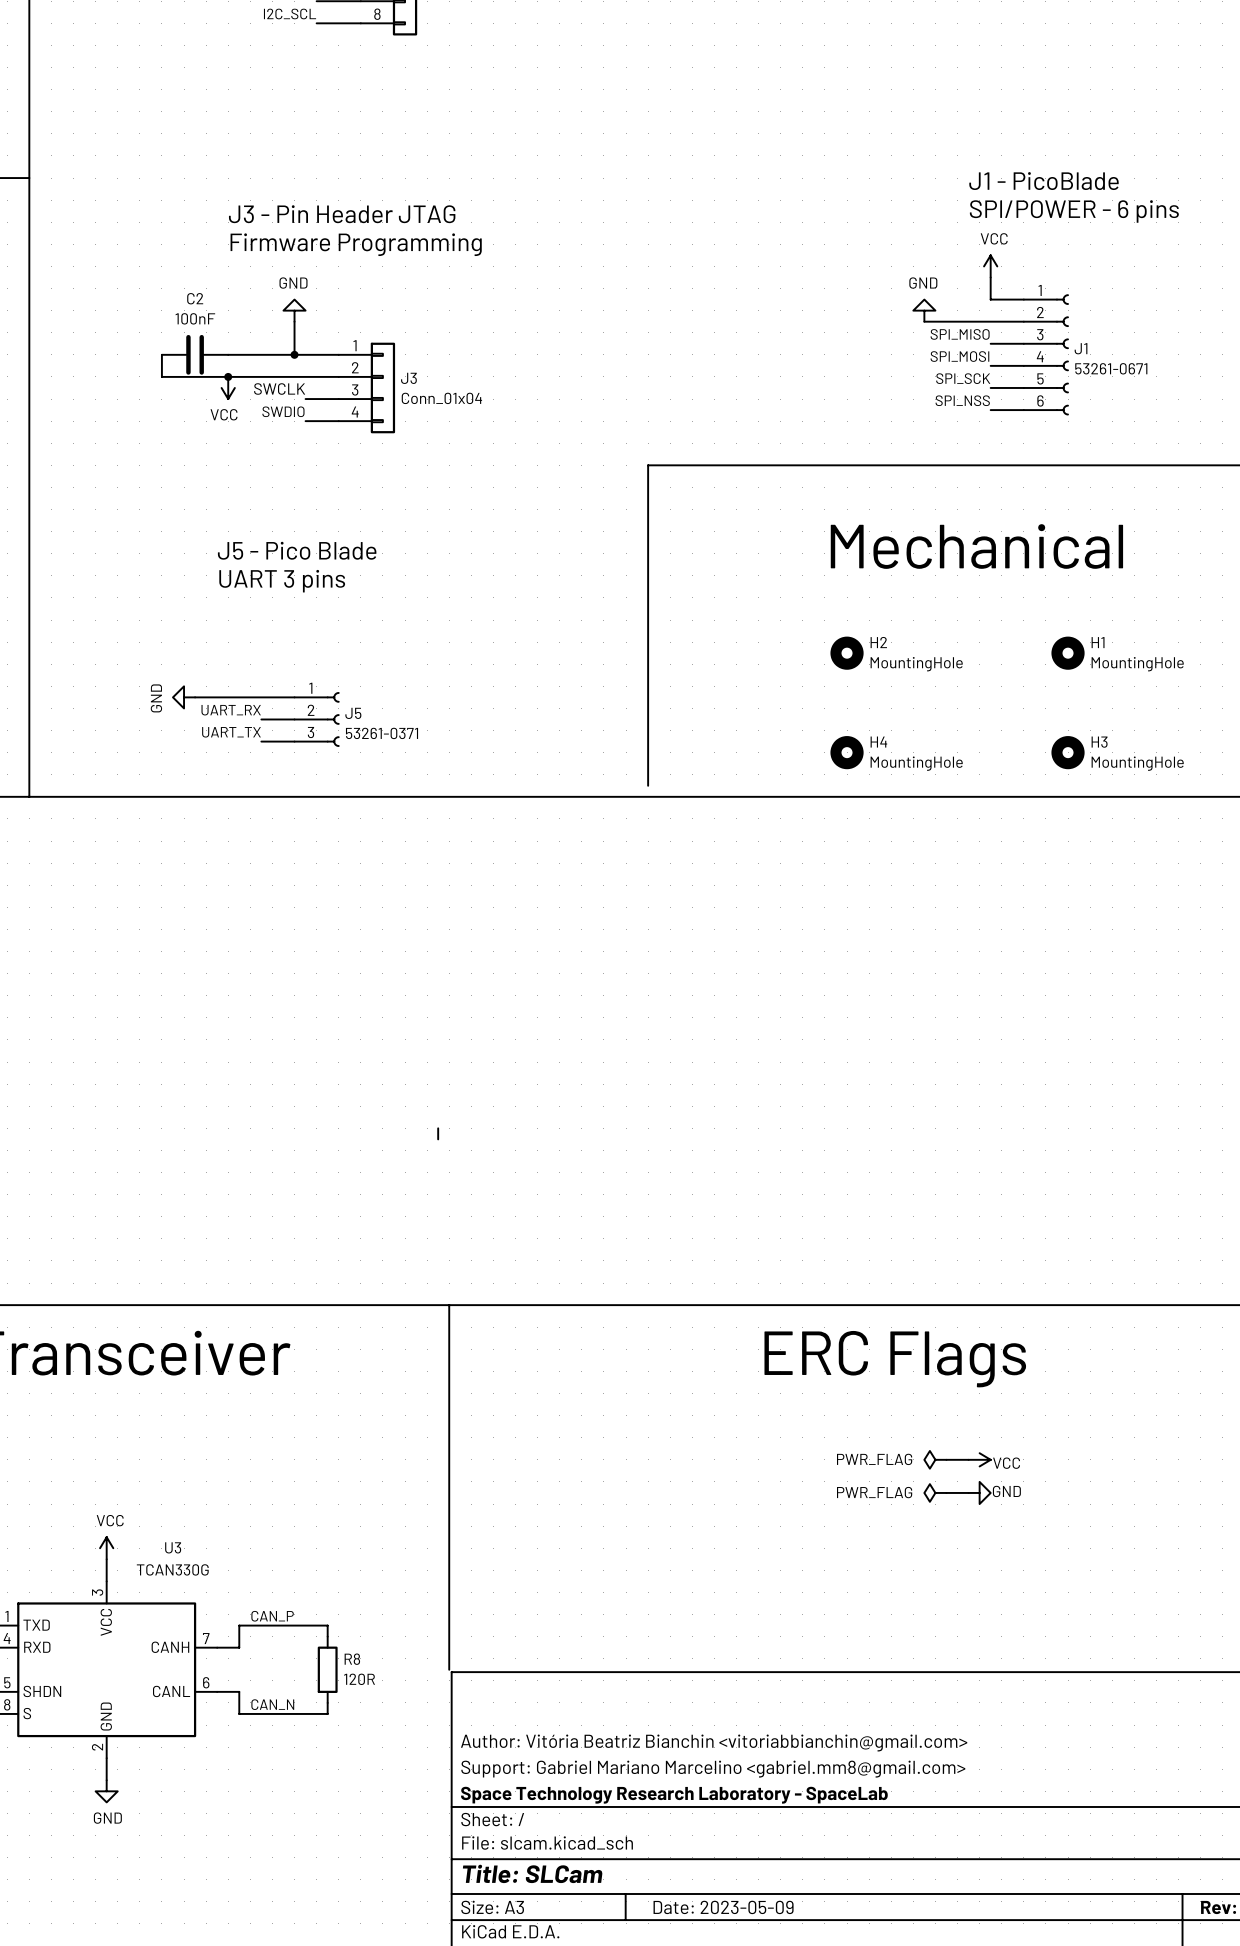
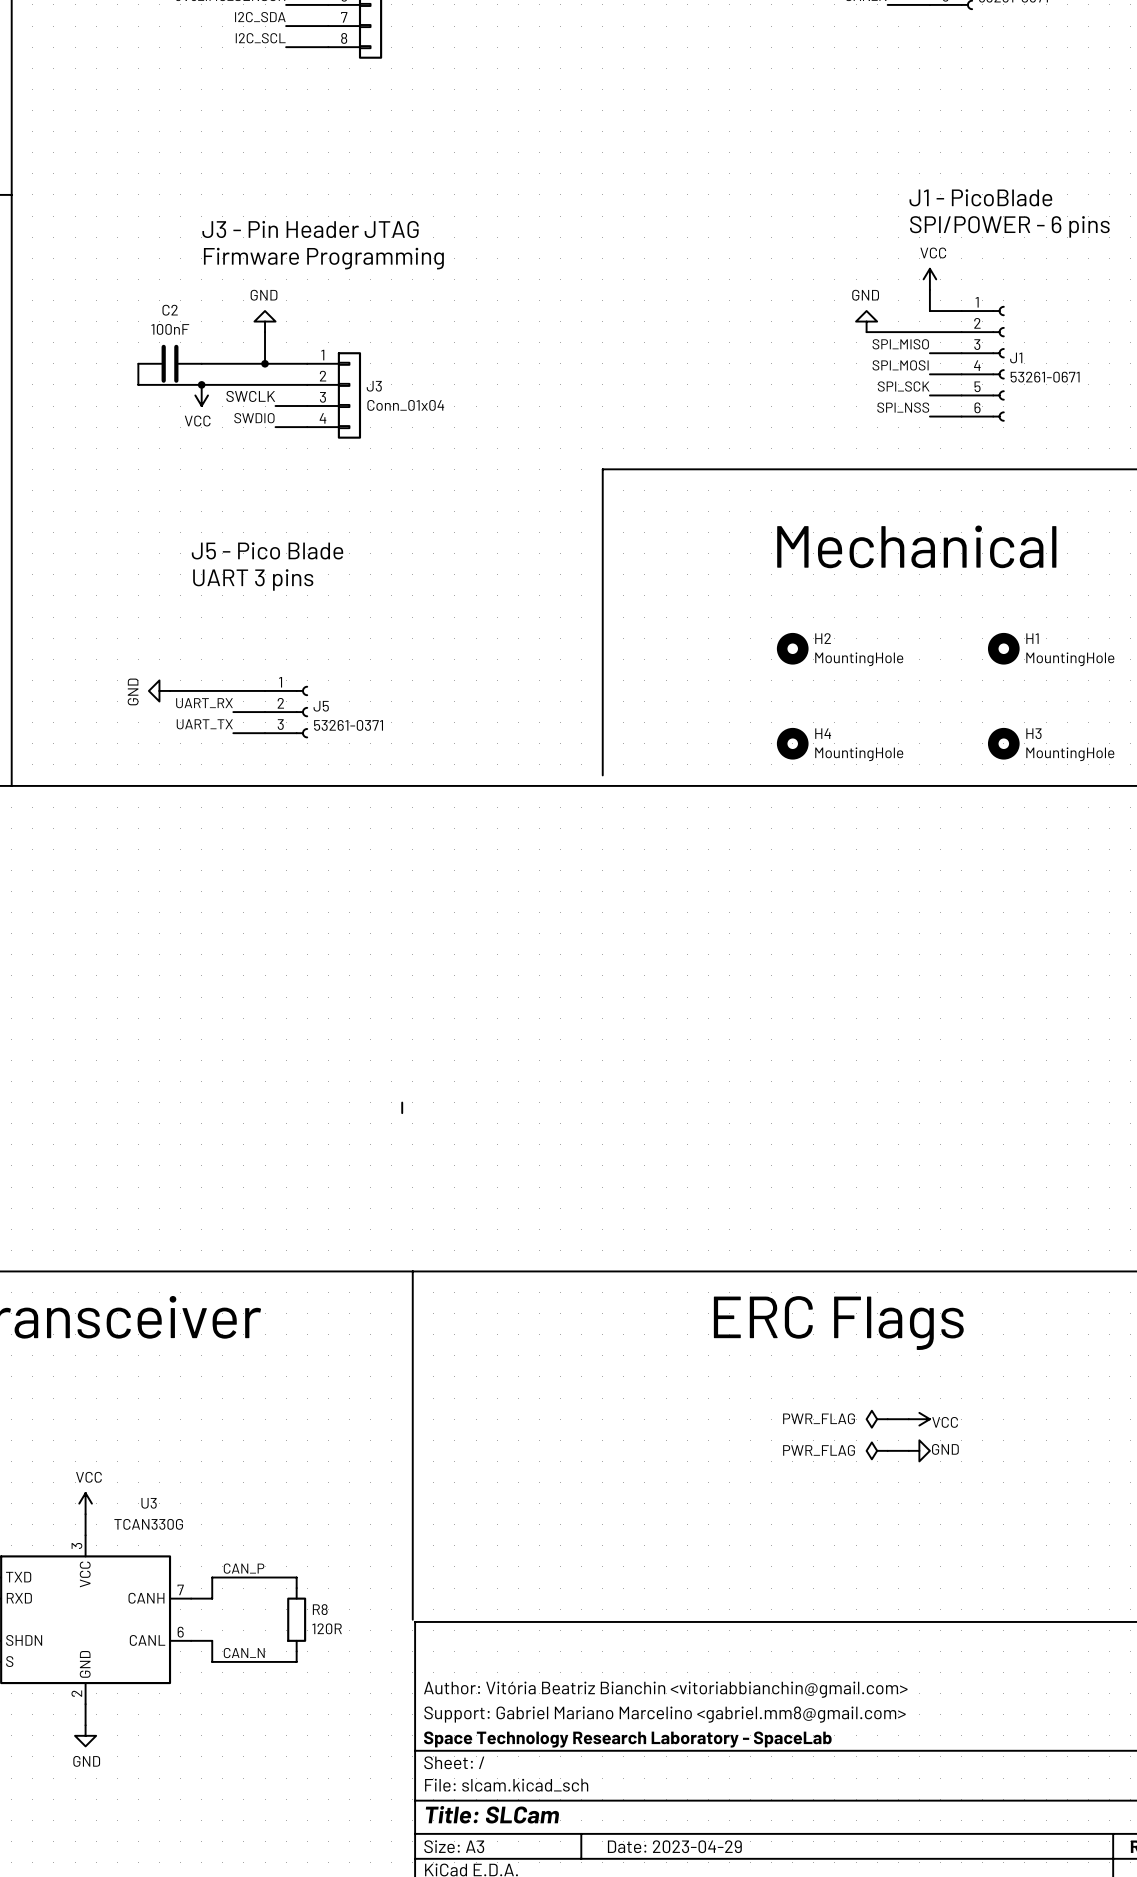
title block: Date: 2023-05-09 (723, 1907) -> Date: 2023-04-29 (674, 1846)

